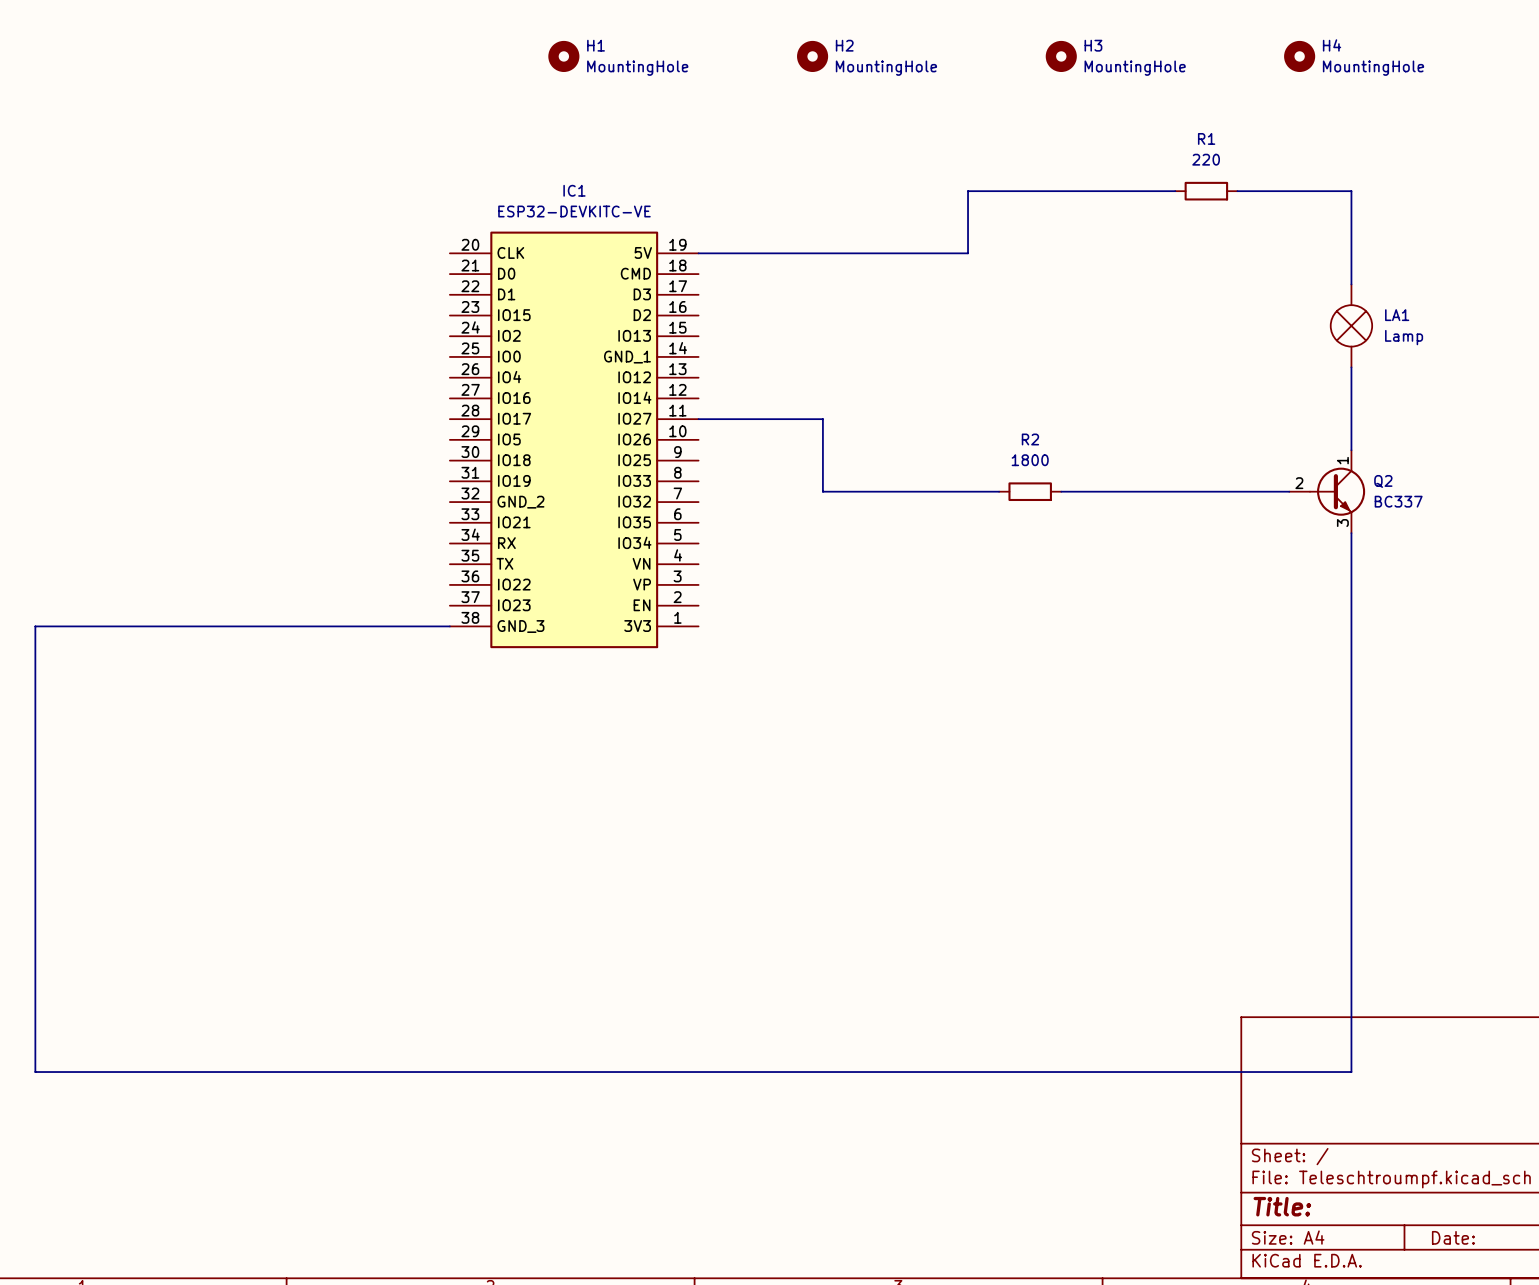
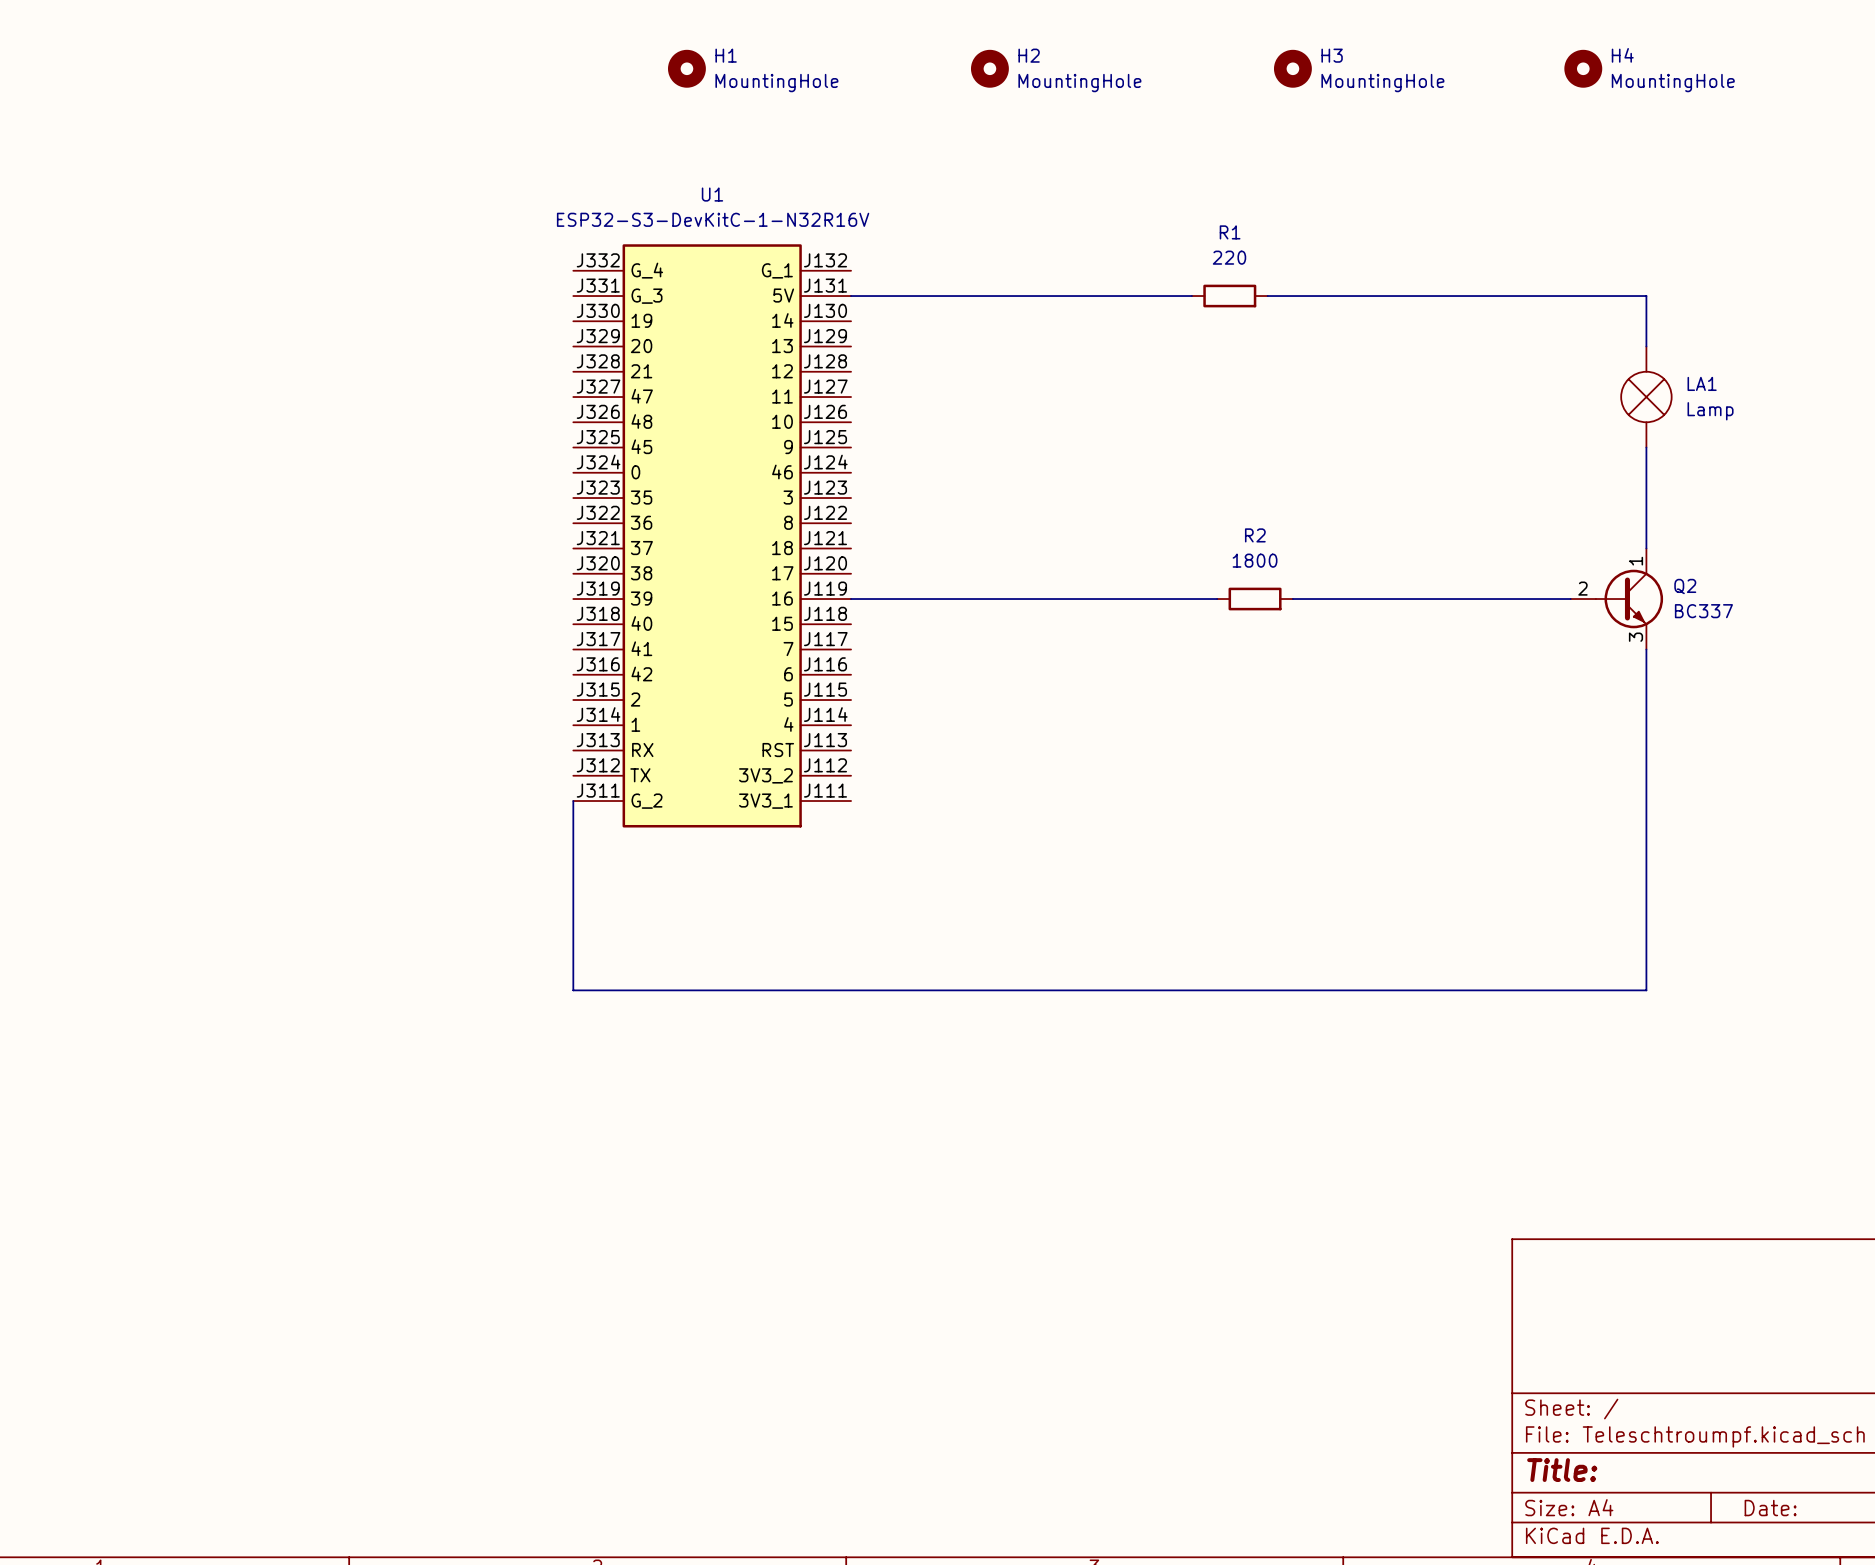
wire: (1175, 191) (968, 191) (968, 253) (698, 253) -> none
R1 position: (1206, 191) -> (1229, 296)
wire: (1237, 191) (1351, 191) (1351, 242) -> (1267, 296) (1646, 296)
wire: none -> (851, 296) (1191, 296)
wire: (698, 419) (822, 419) (822, 491) -> (851, 599) (1002, 599)
IC1: ESP32-DEVKITC-VE (574, 439) -> none
U1: none -> ESP32-S3-DevKitC-1-N32R16V (712, 535)
wire: (449, 626) (35, 626) (35, 1072) (1351, 1072) (1351, 812) -> (573, 801) (573, 990) (1646, 990)

